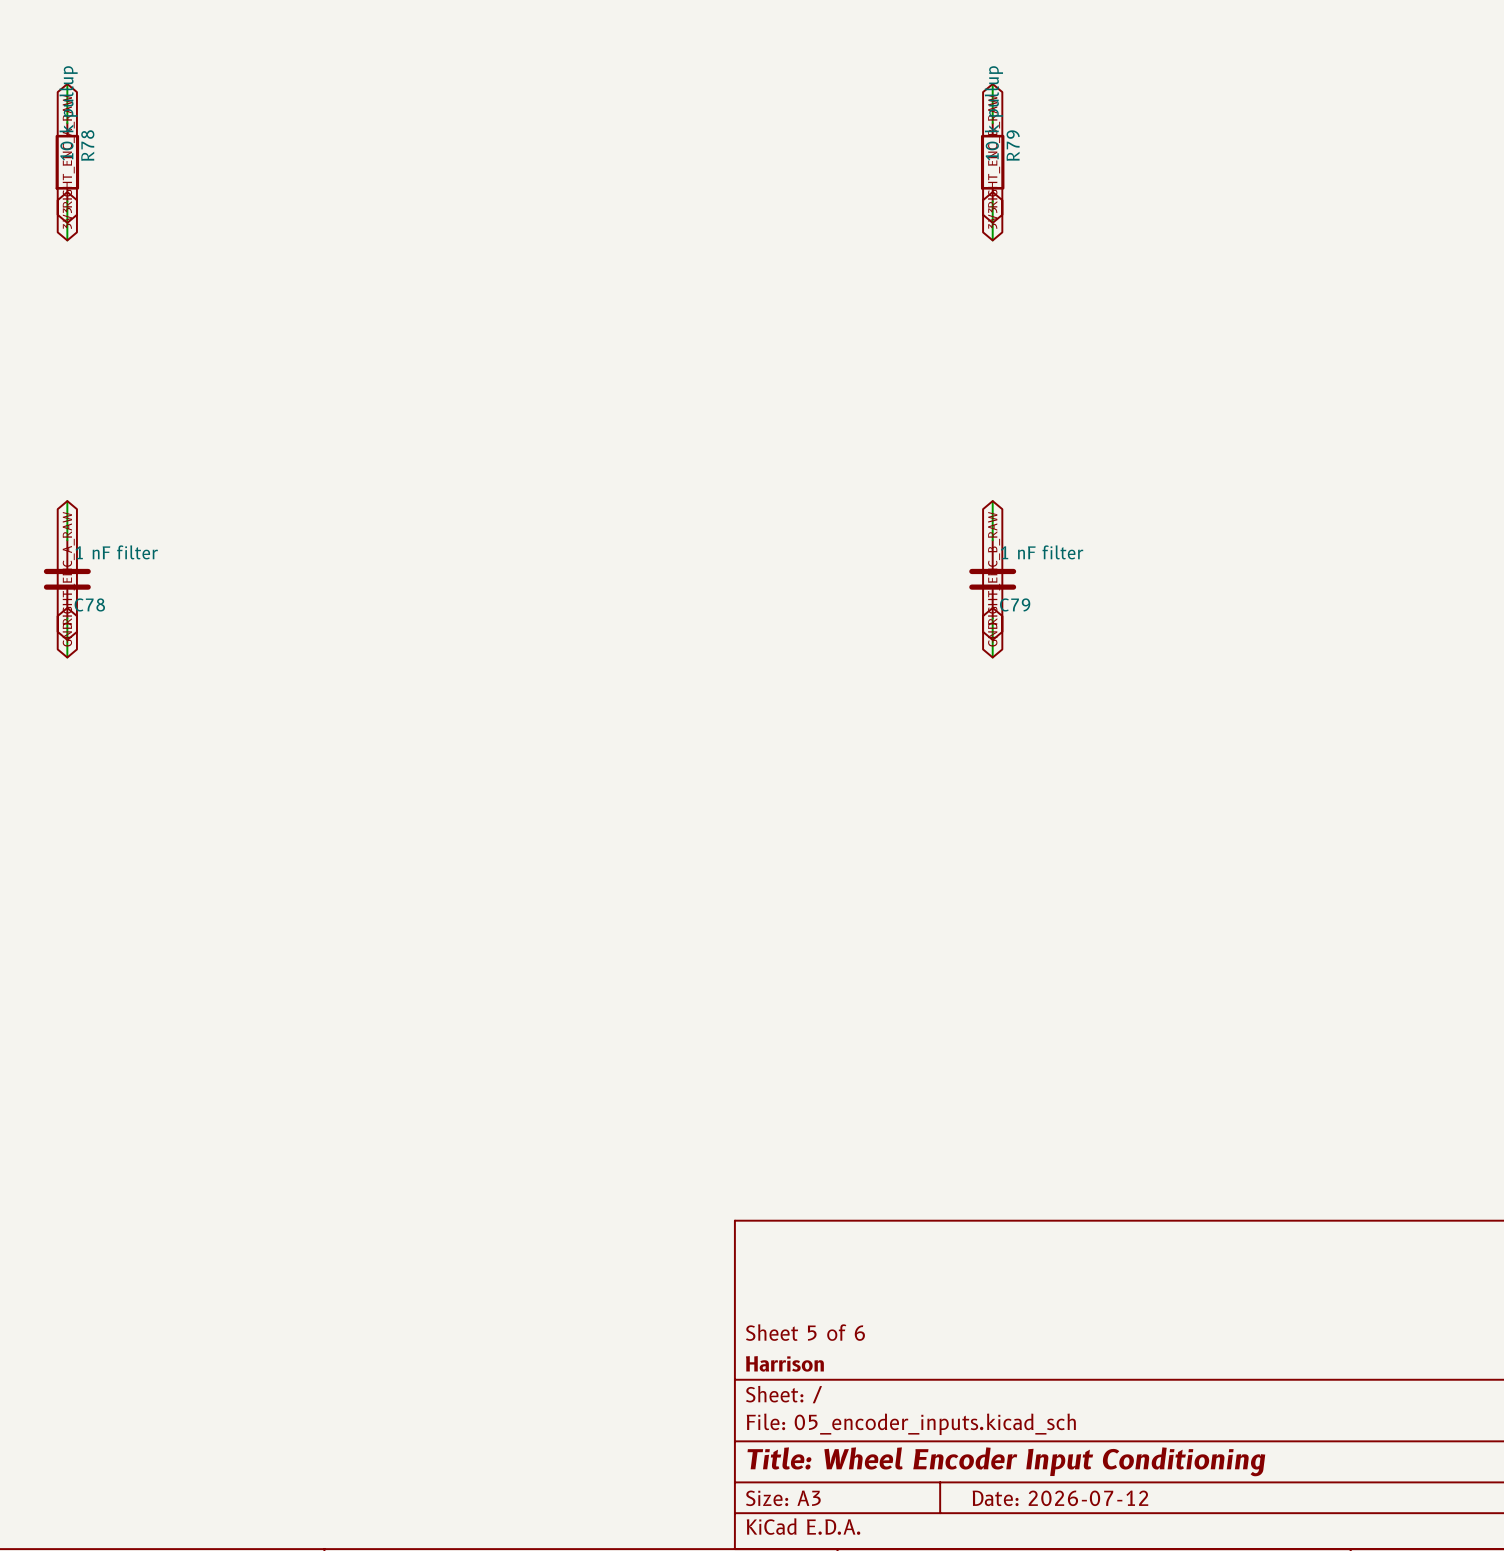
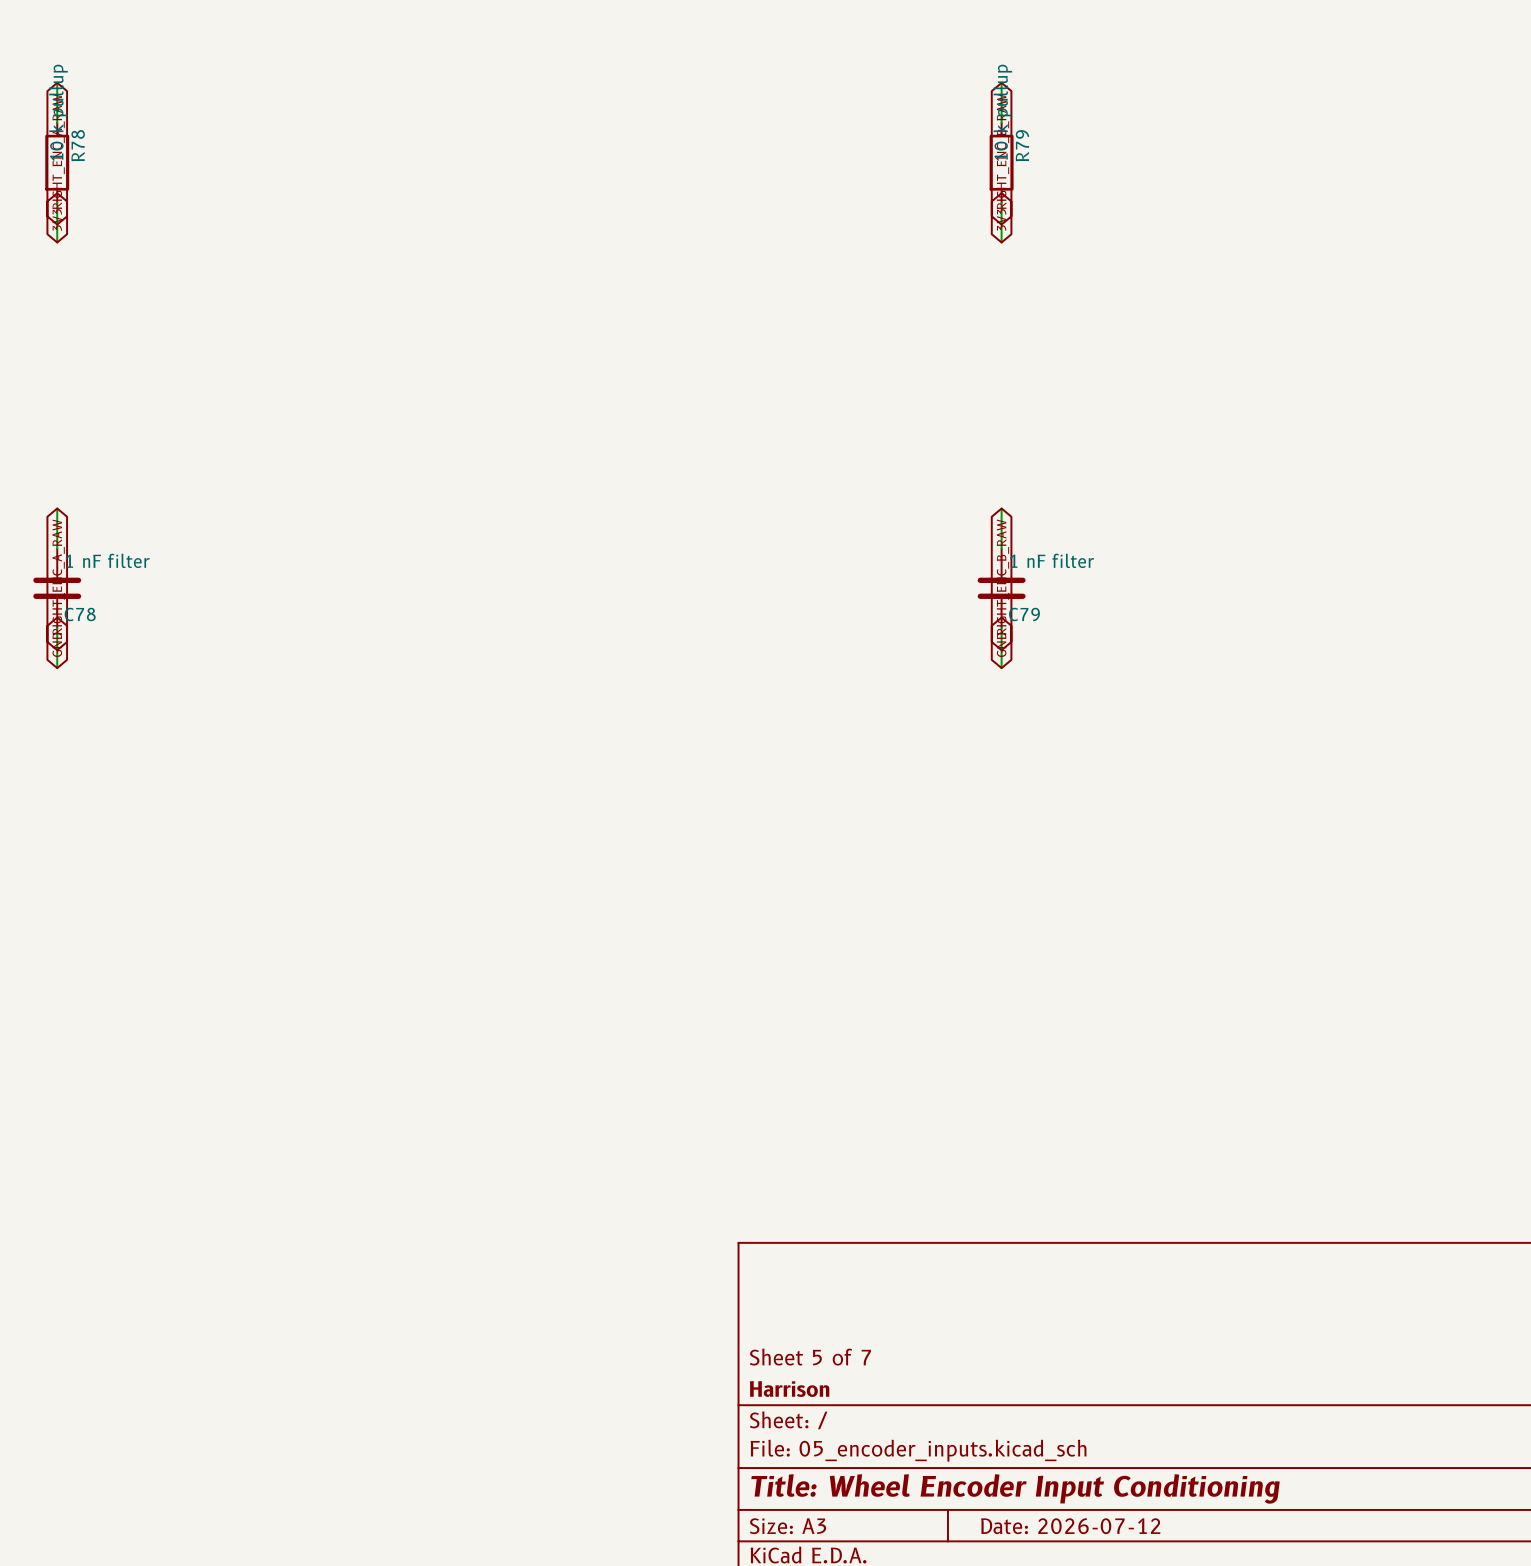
title block: Sheet 5 of 6 (805, 1332) -> Sheet 5 of 7 (810, 1357)

